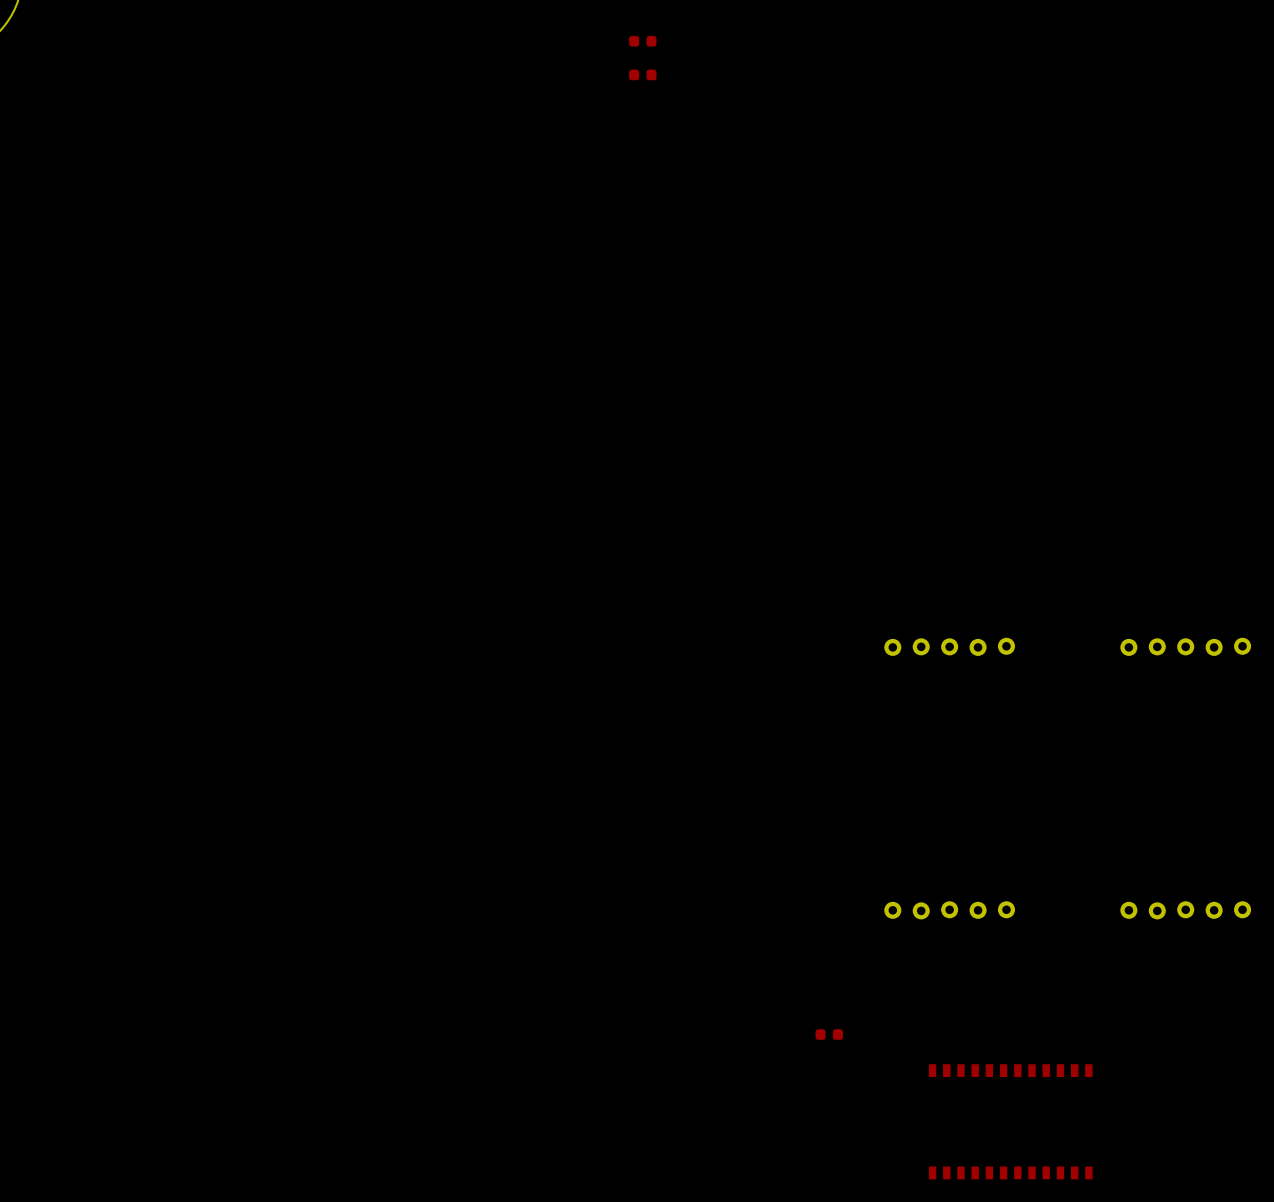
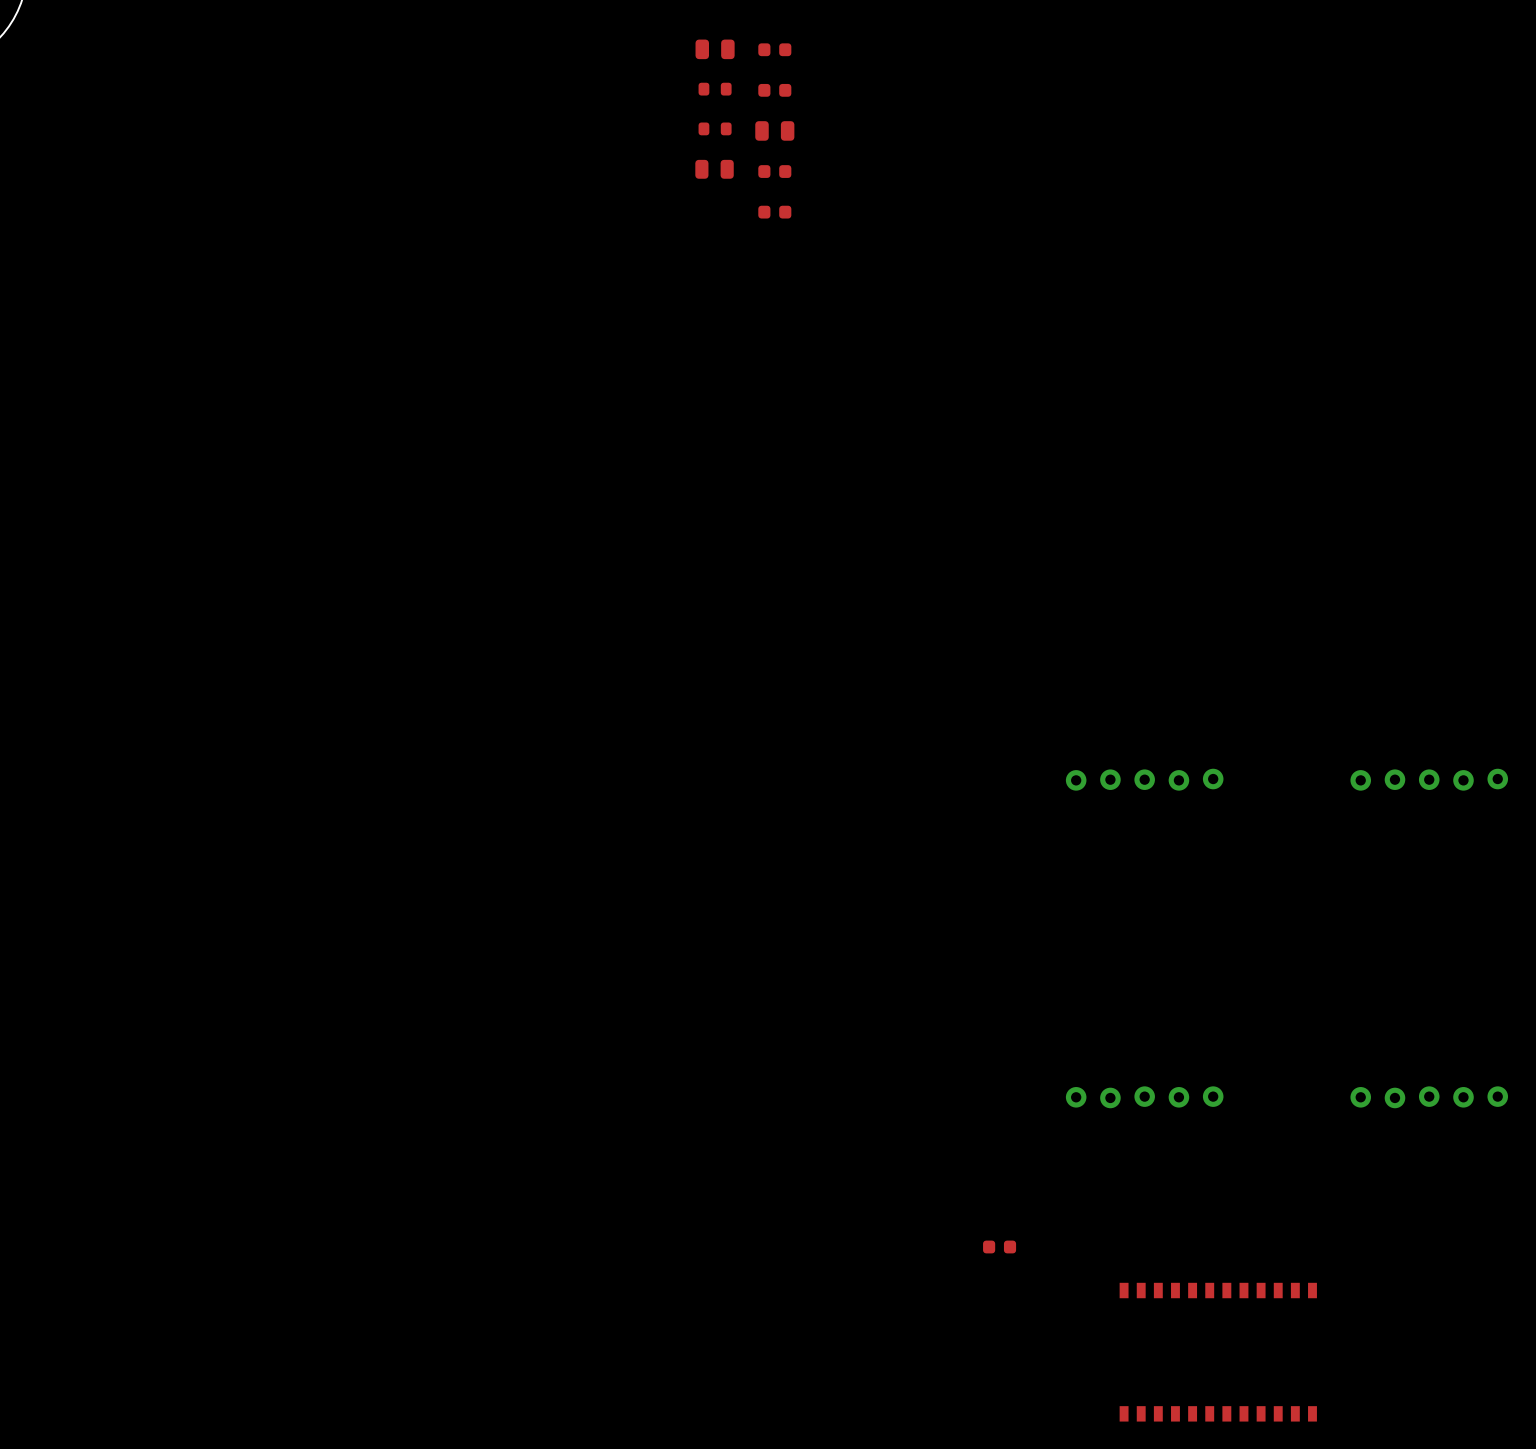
part: none -> (715, 49)
part: none -> (715, 89)
part: none -> (715, 128)
part: none -> (774, 130)
part: none -> (714, 169)
part: none -> (774, 171)
part: none -> (774, 212)

